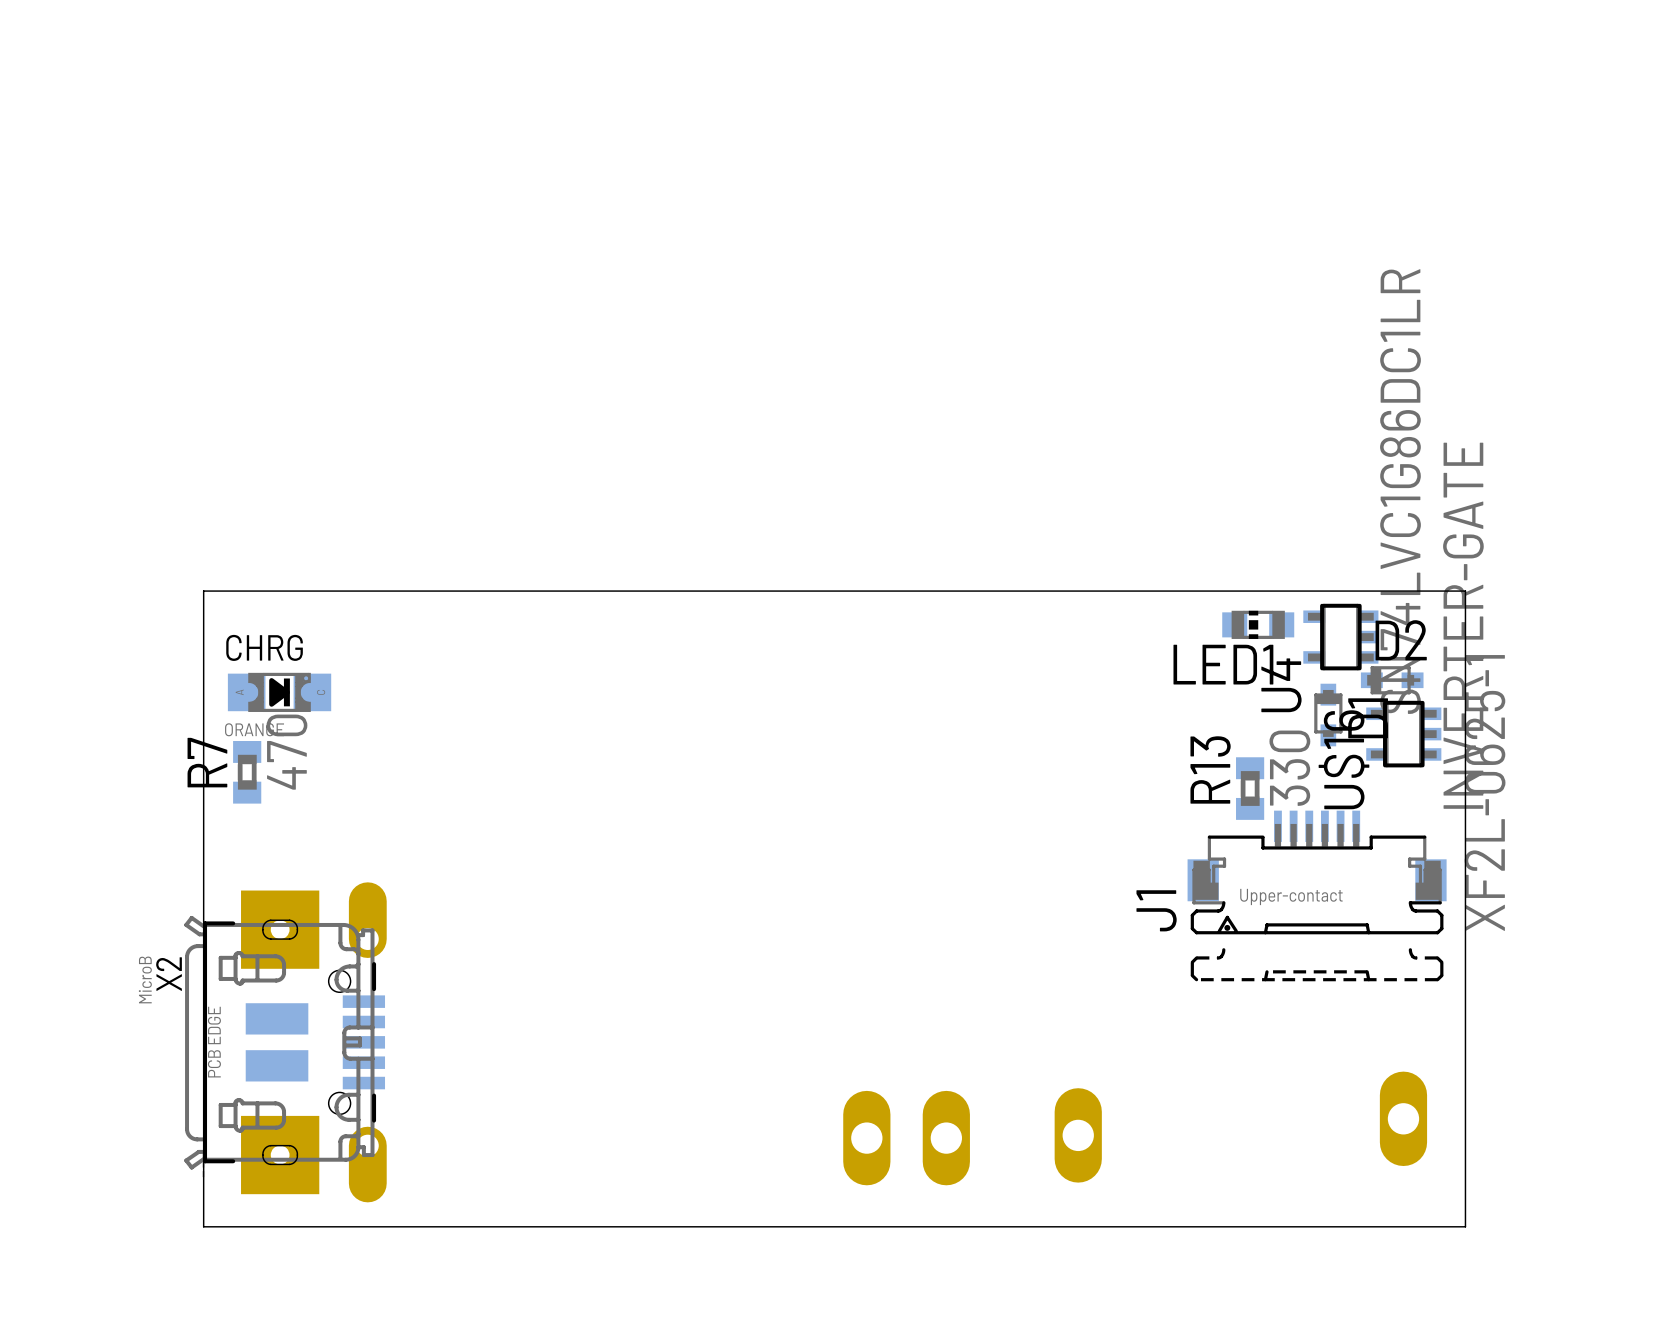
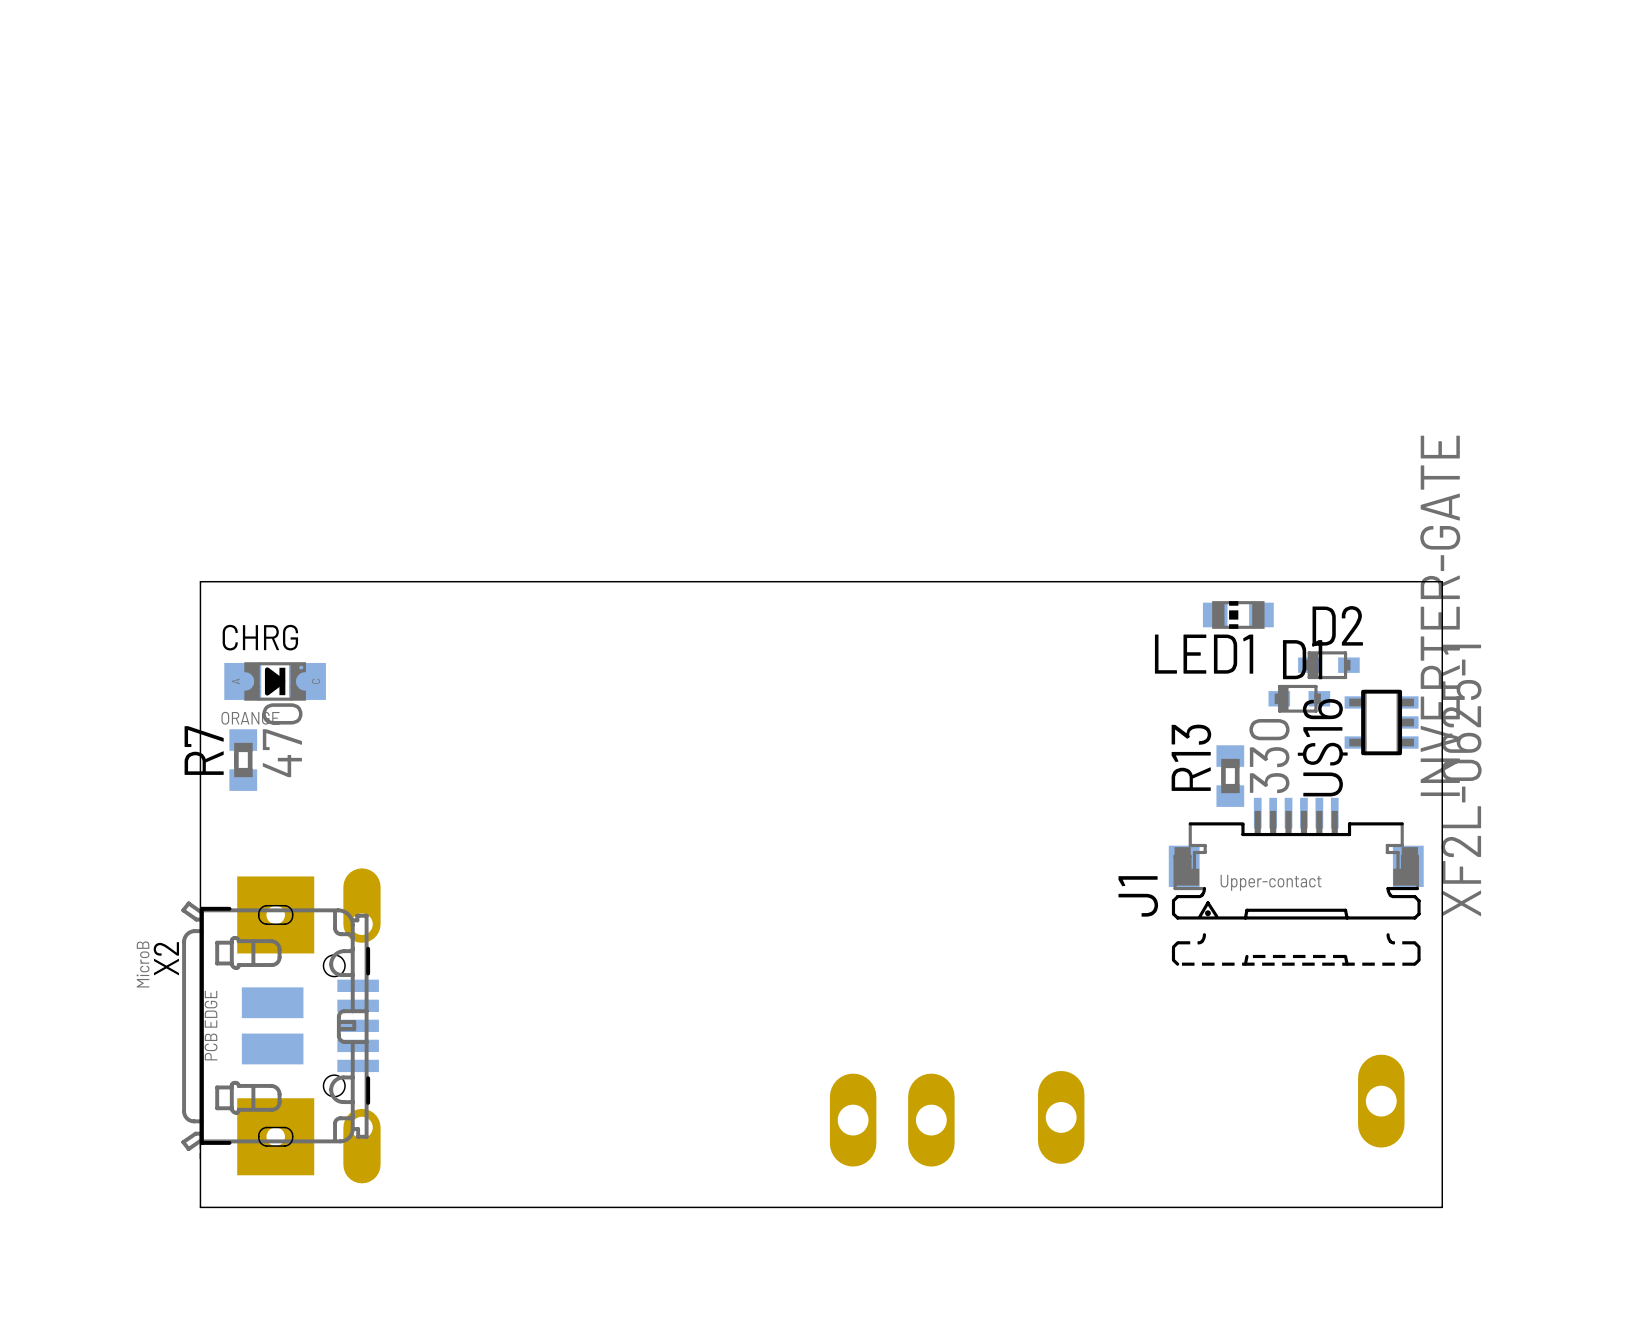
U4: SN74LVC1G86DC1LR (1340, 637) -> none
D2 position: (1392, 680) -> (1328, 665)
D1 rotation: 0° (1328, 715) -> 90° counterclockwise (1299, 698)

